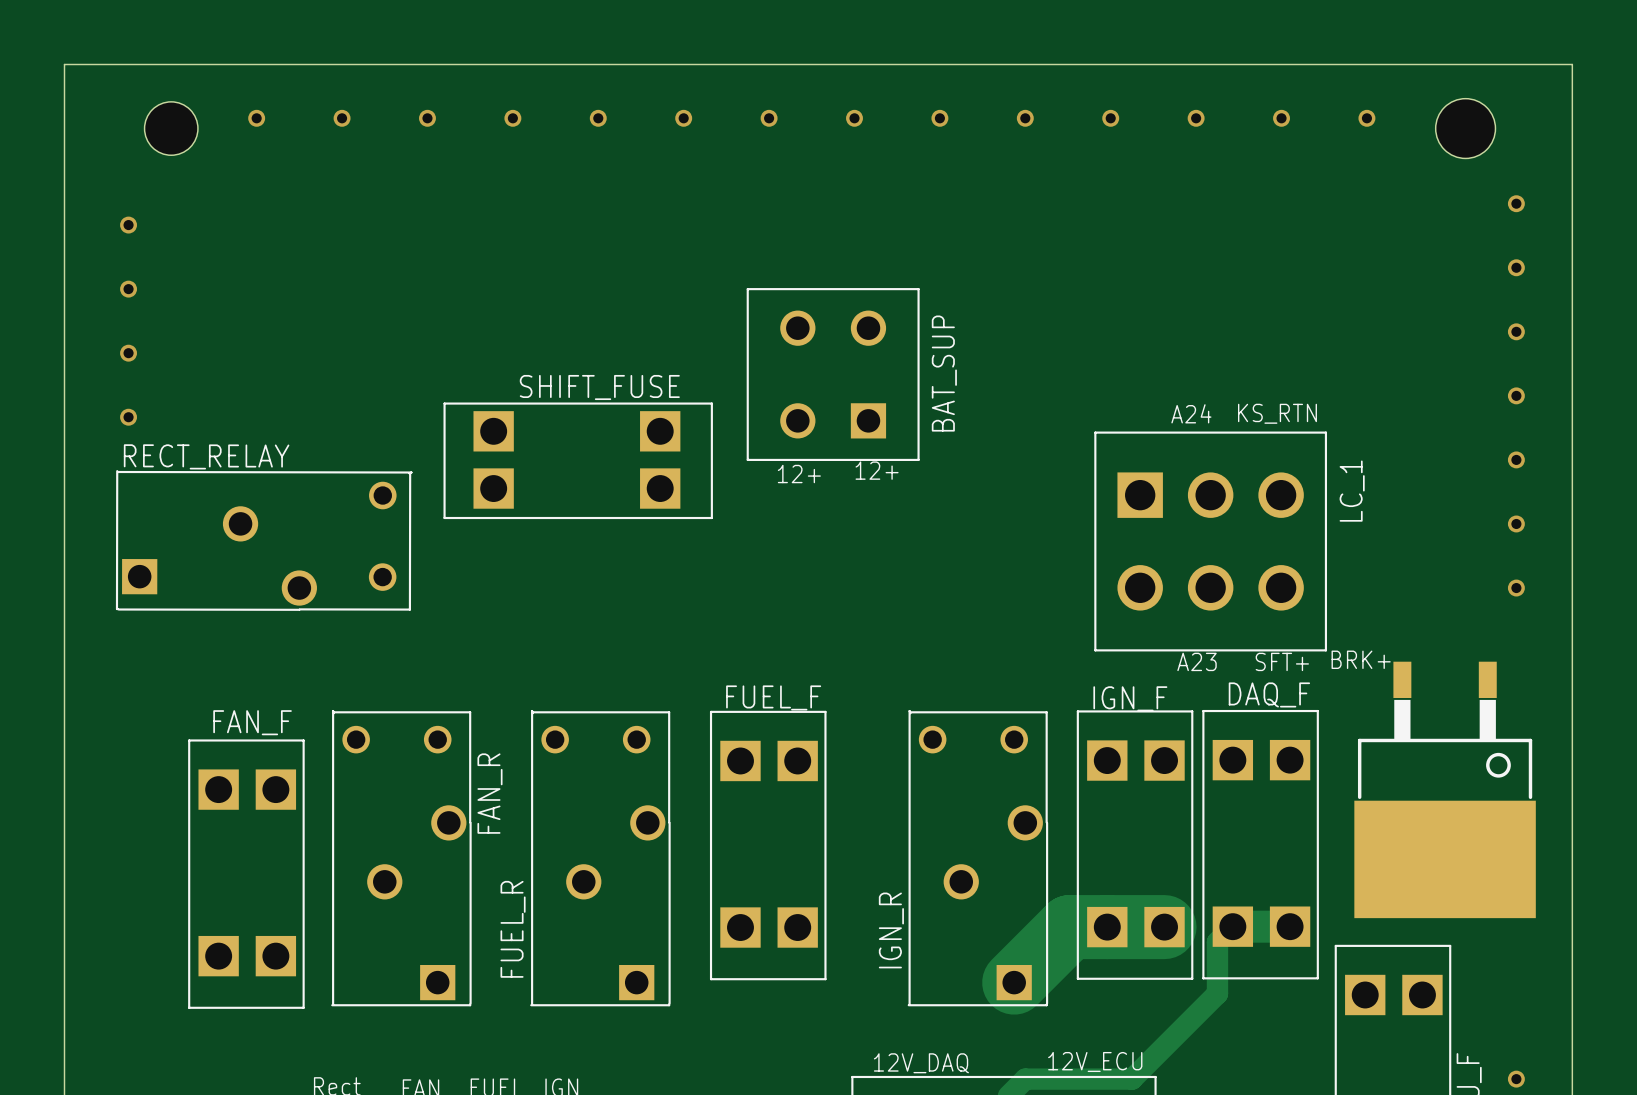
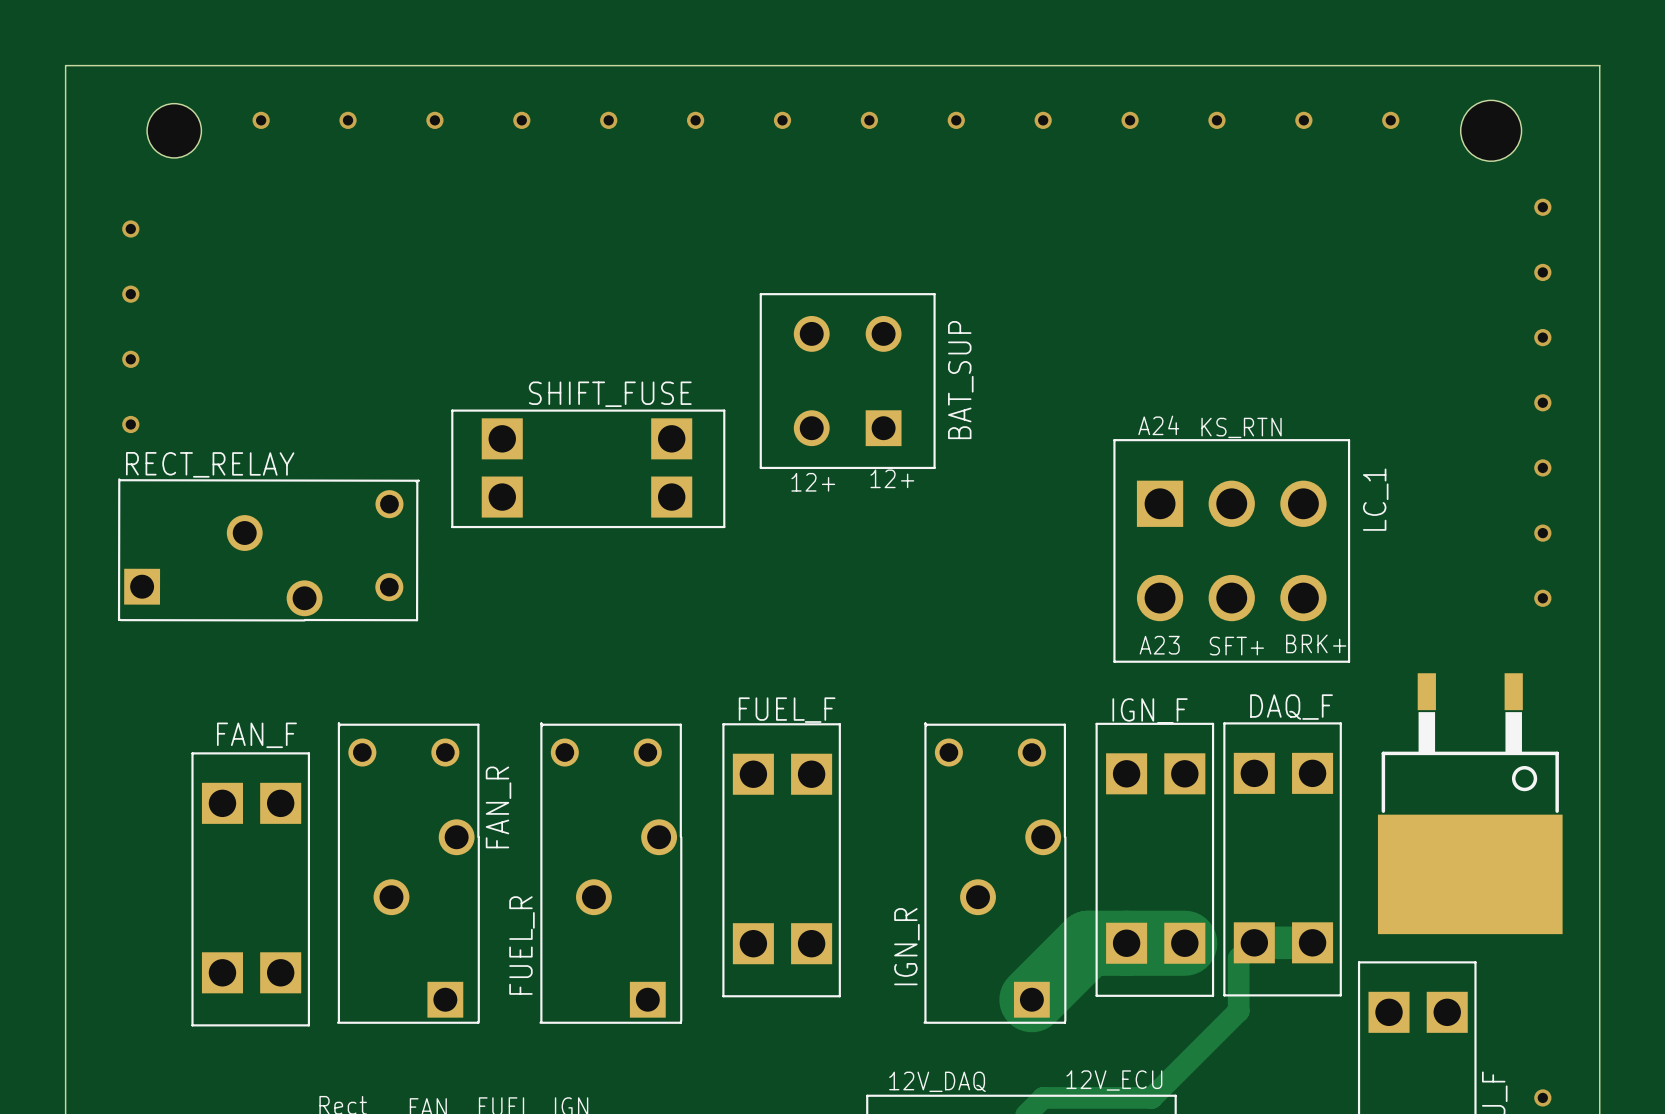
text position: A24 (1191, 413) -> A24 (1158, 425)
text position: KS_RTN (1277, 413) -> KS_RTN (1241, 427)
text position: BRK+ (1361, 659) -> BRK+ (1316, 643)
text position: A23 (1197, 661) -> A23 (1159, 645)
text position: SFT+ (1282, 661) -> SFT+ (1236, 646)

